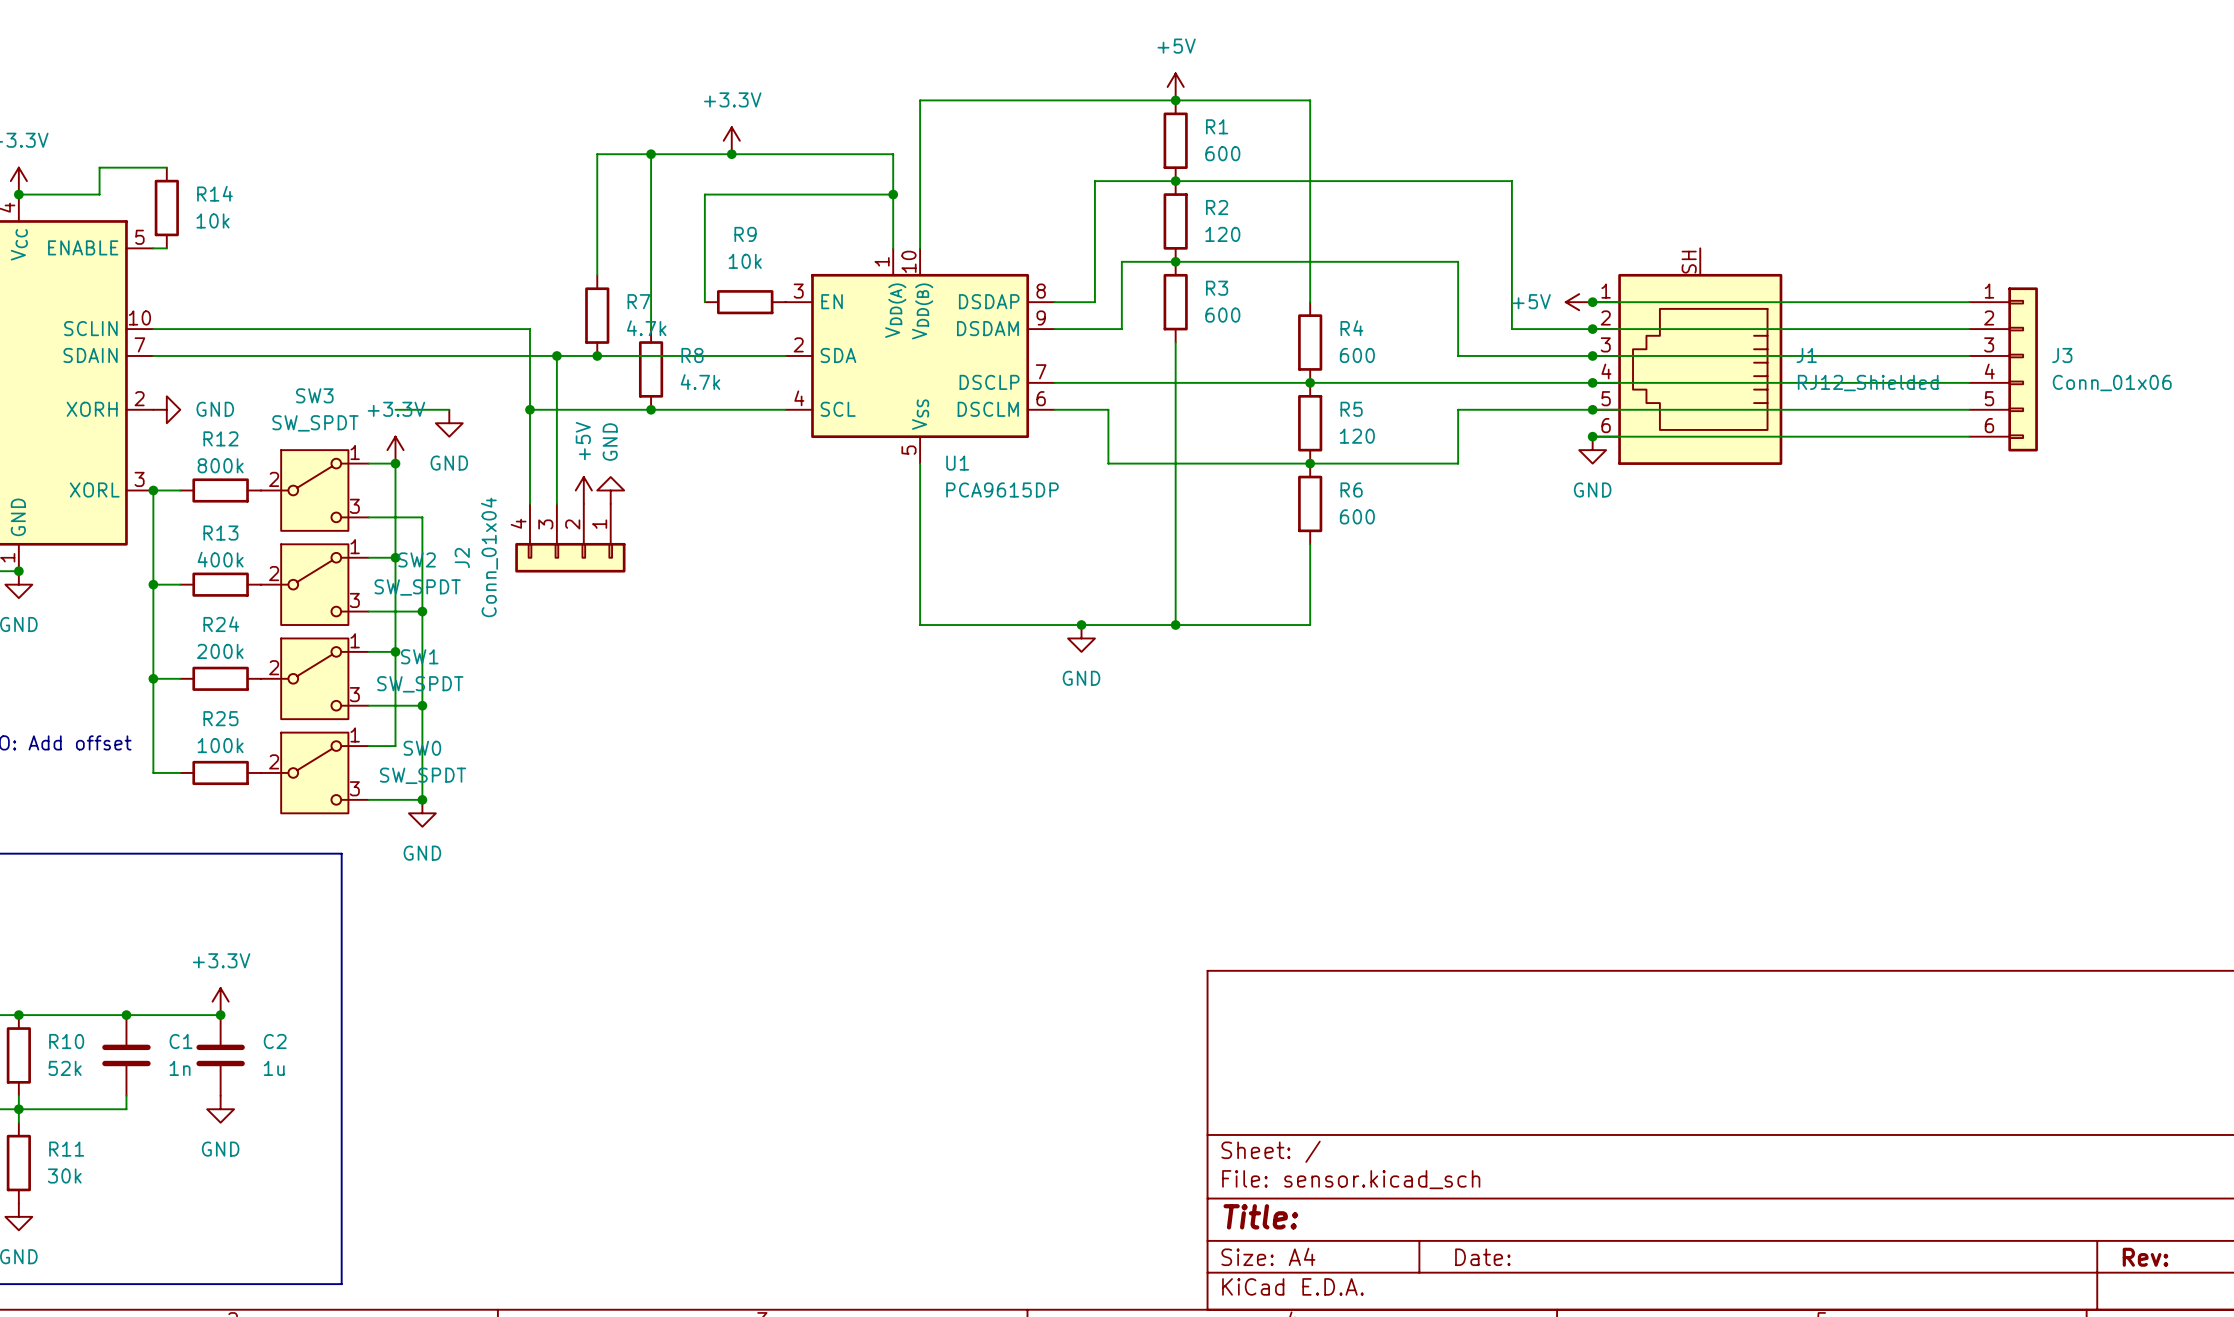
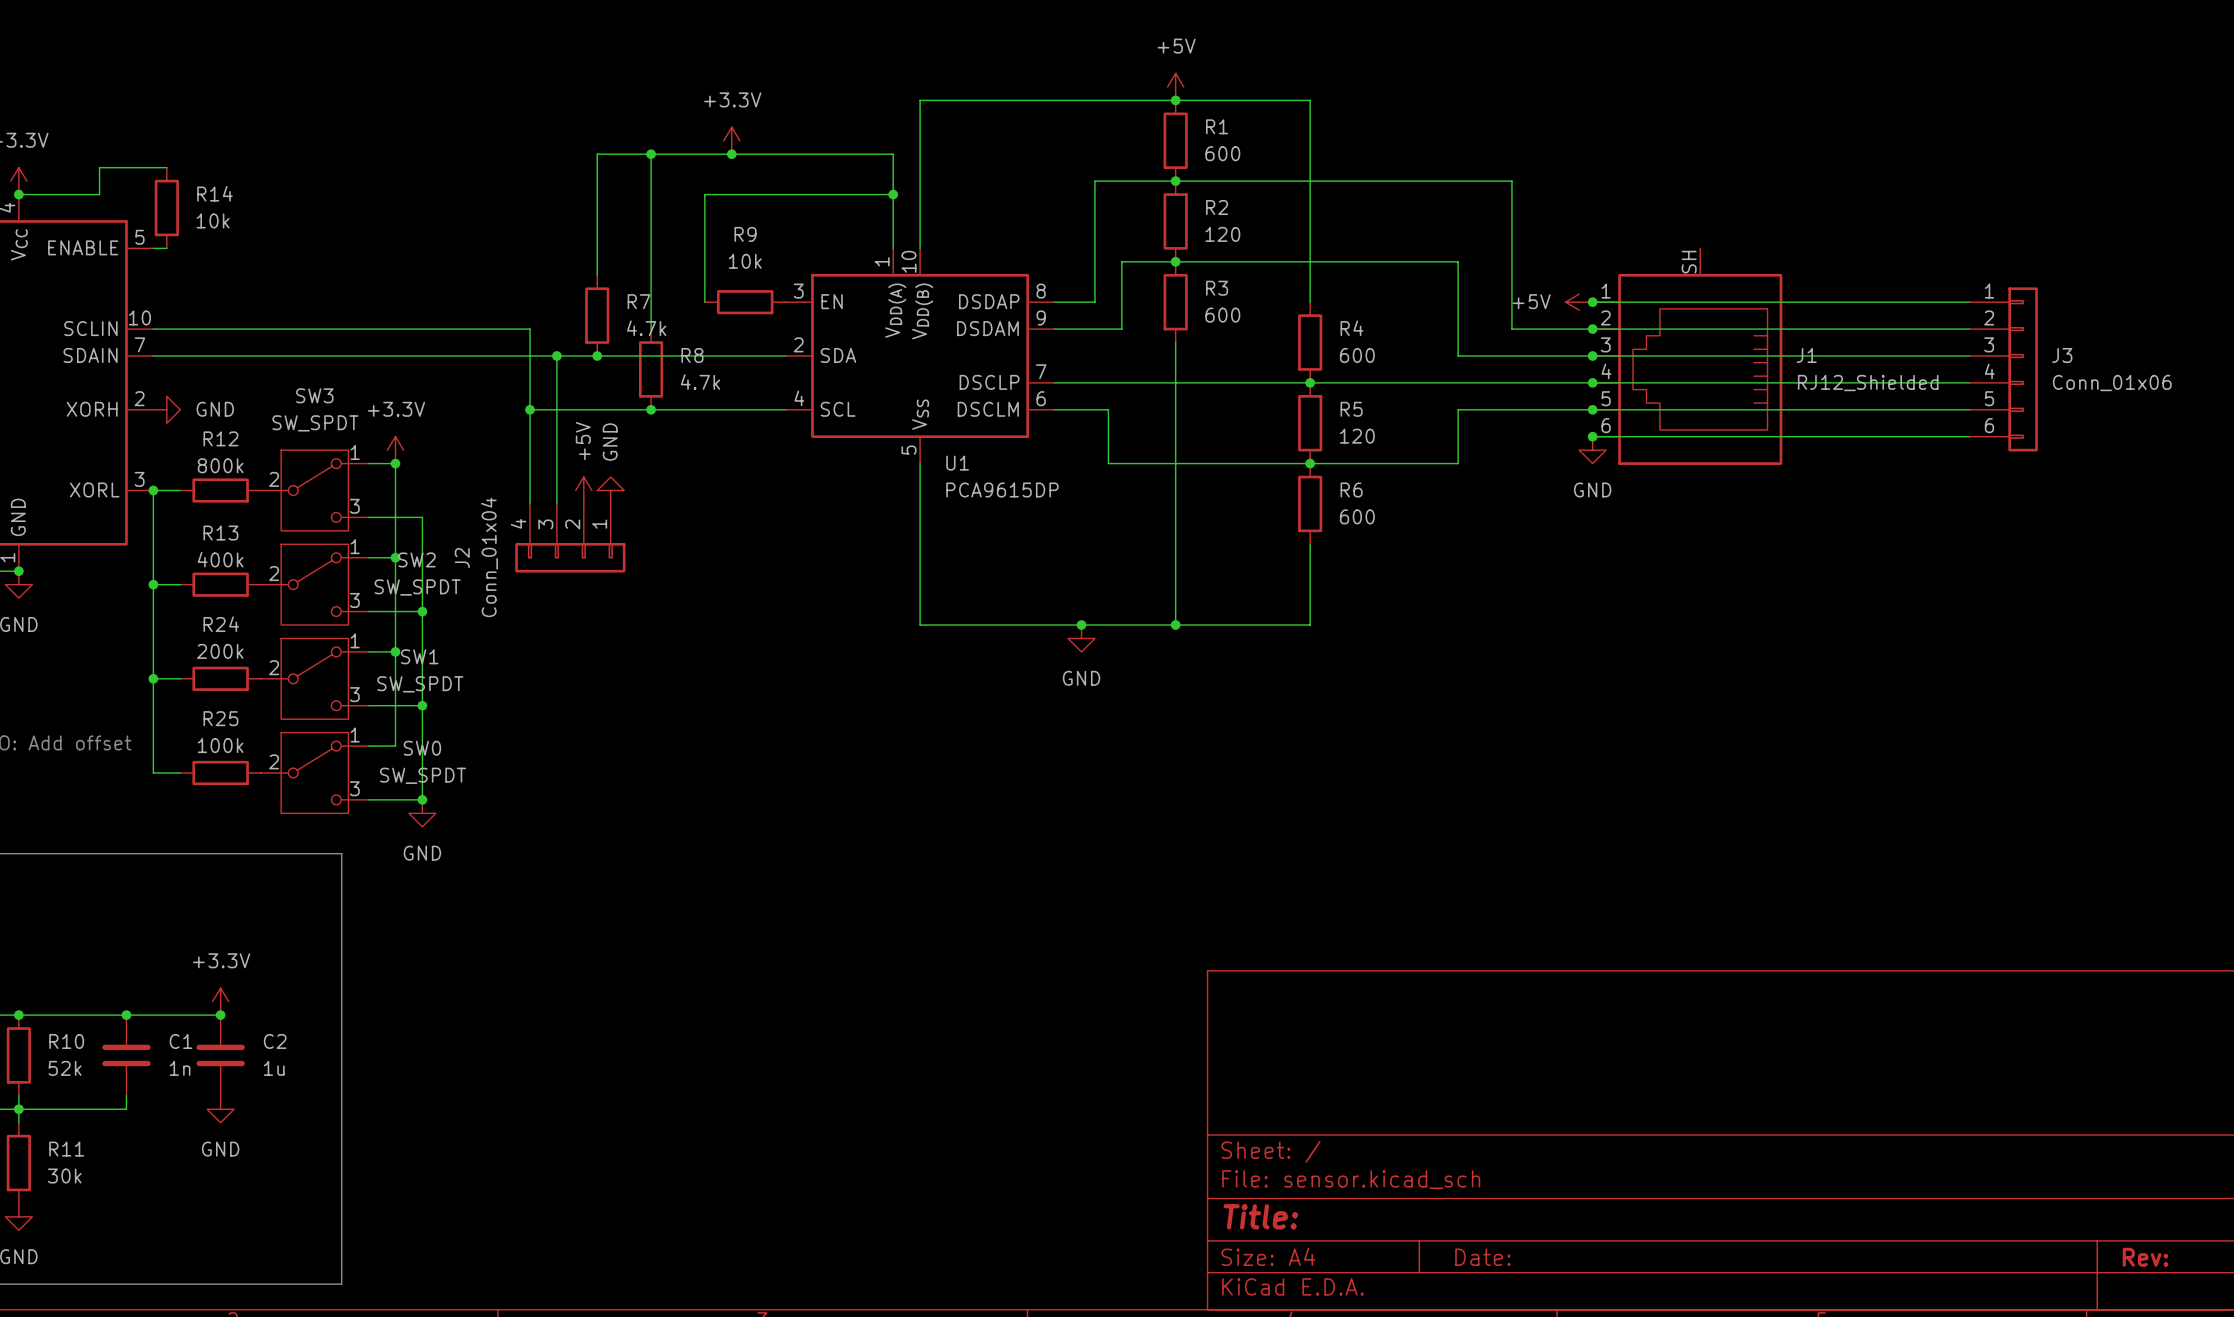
wire: (395, 409) (449, 409) -> none
power symbol: GND (449, 423) -> none

